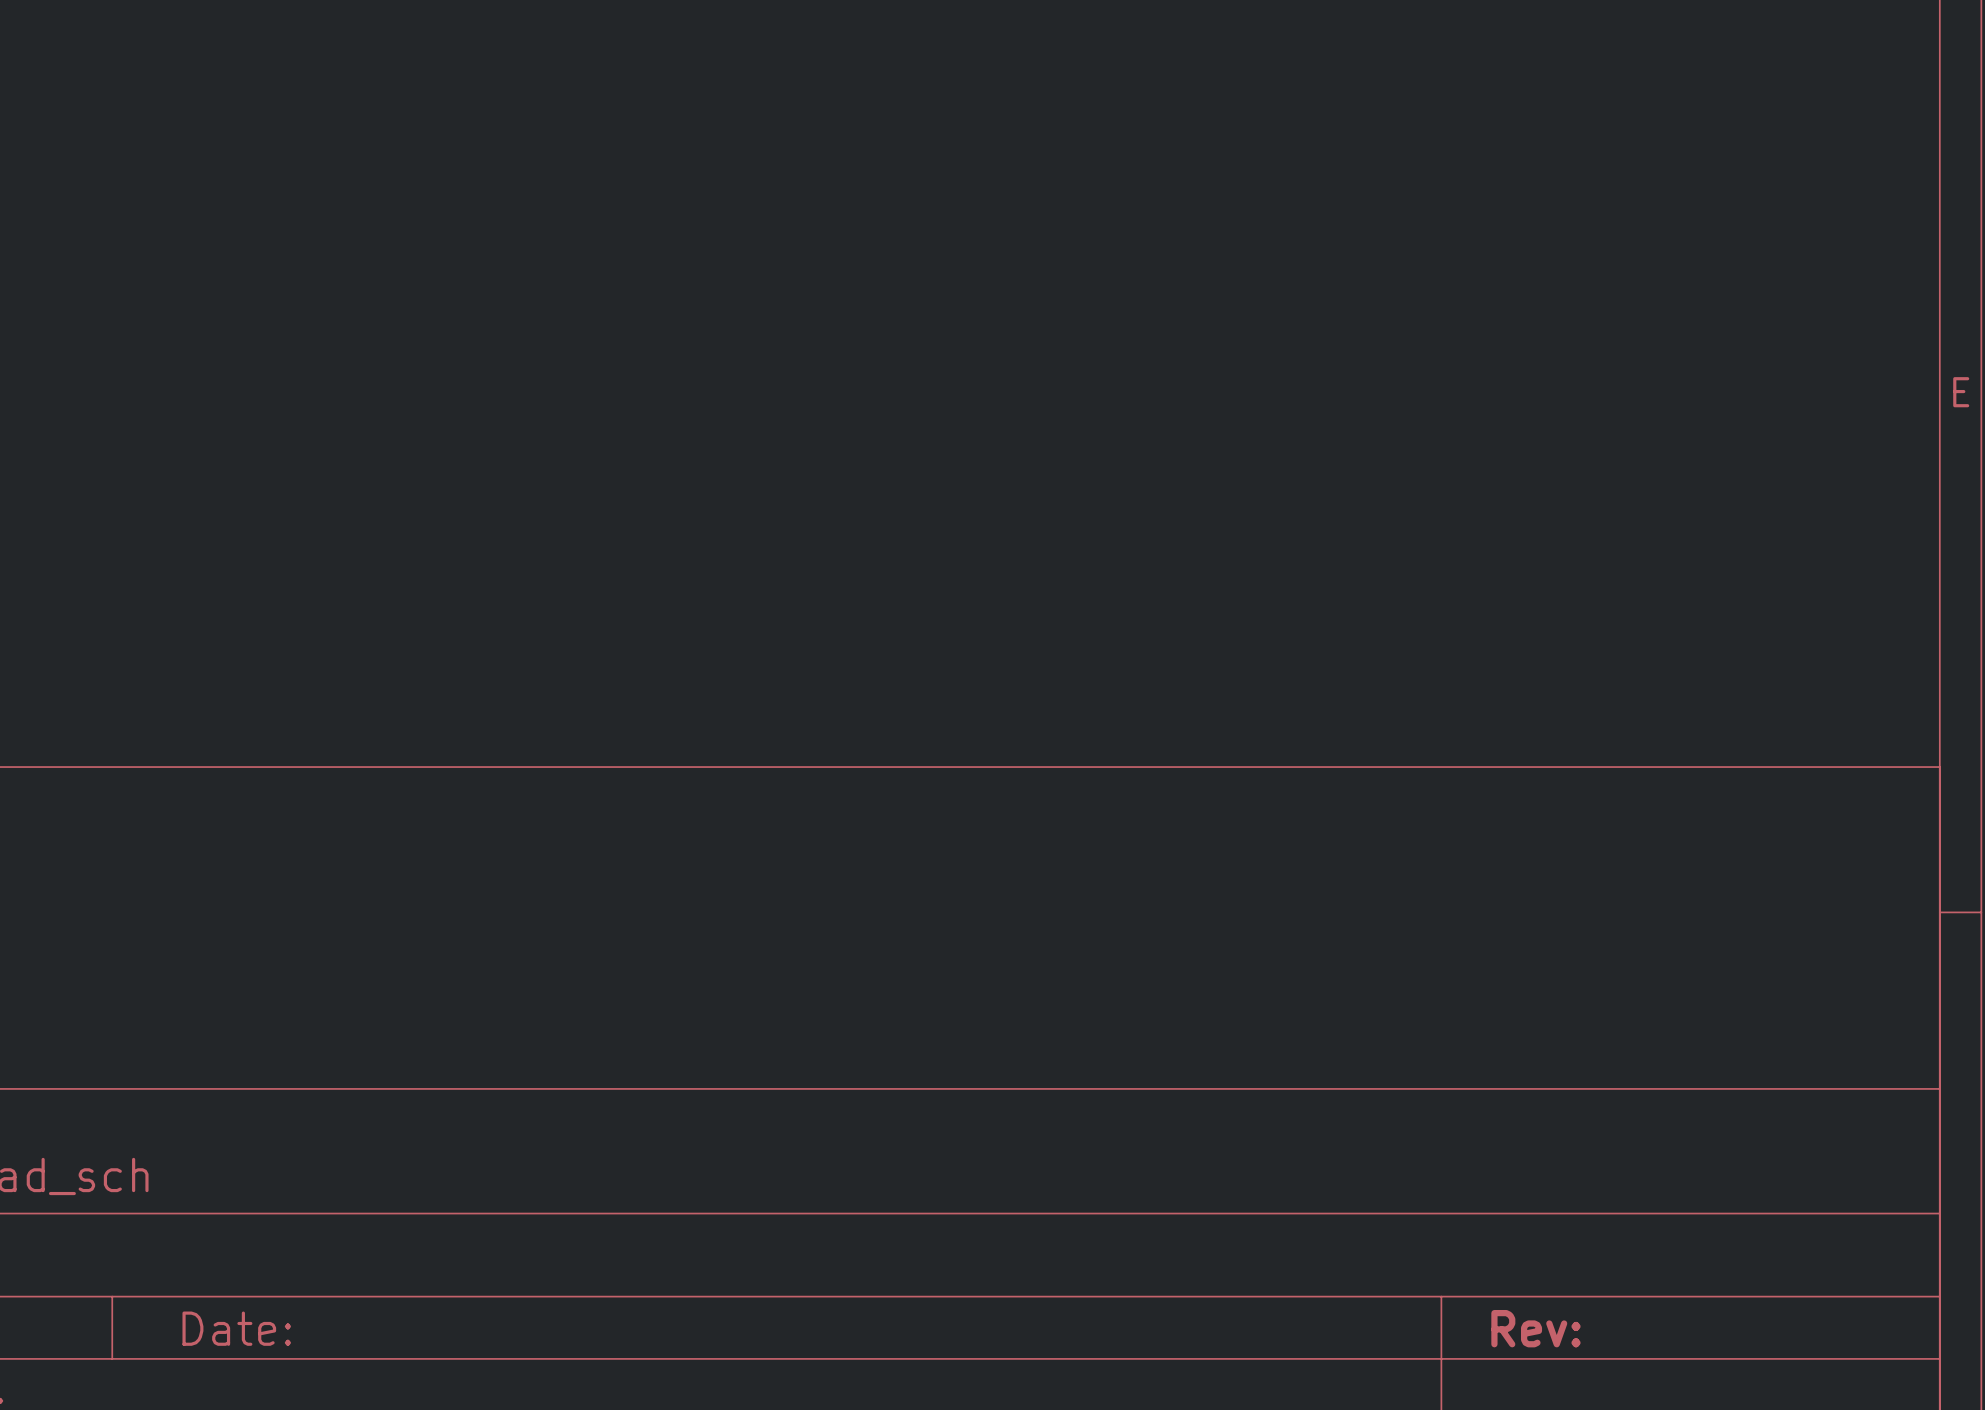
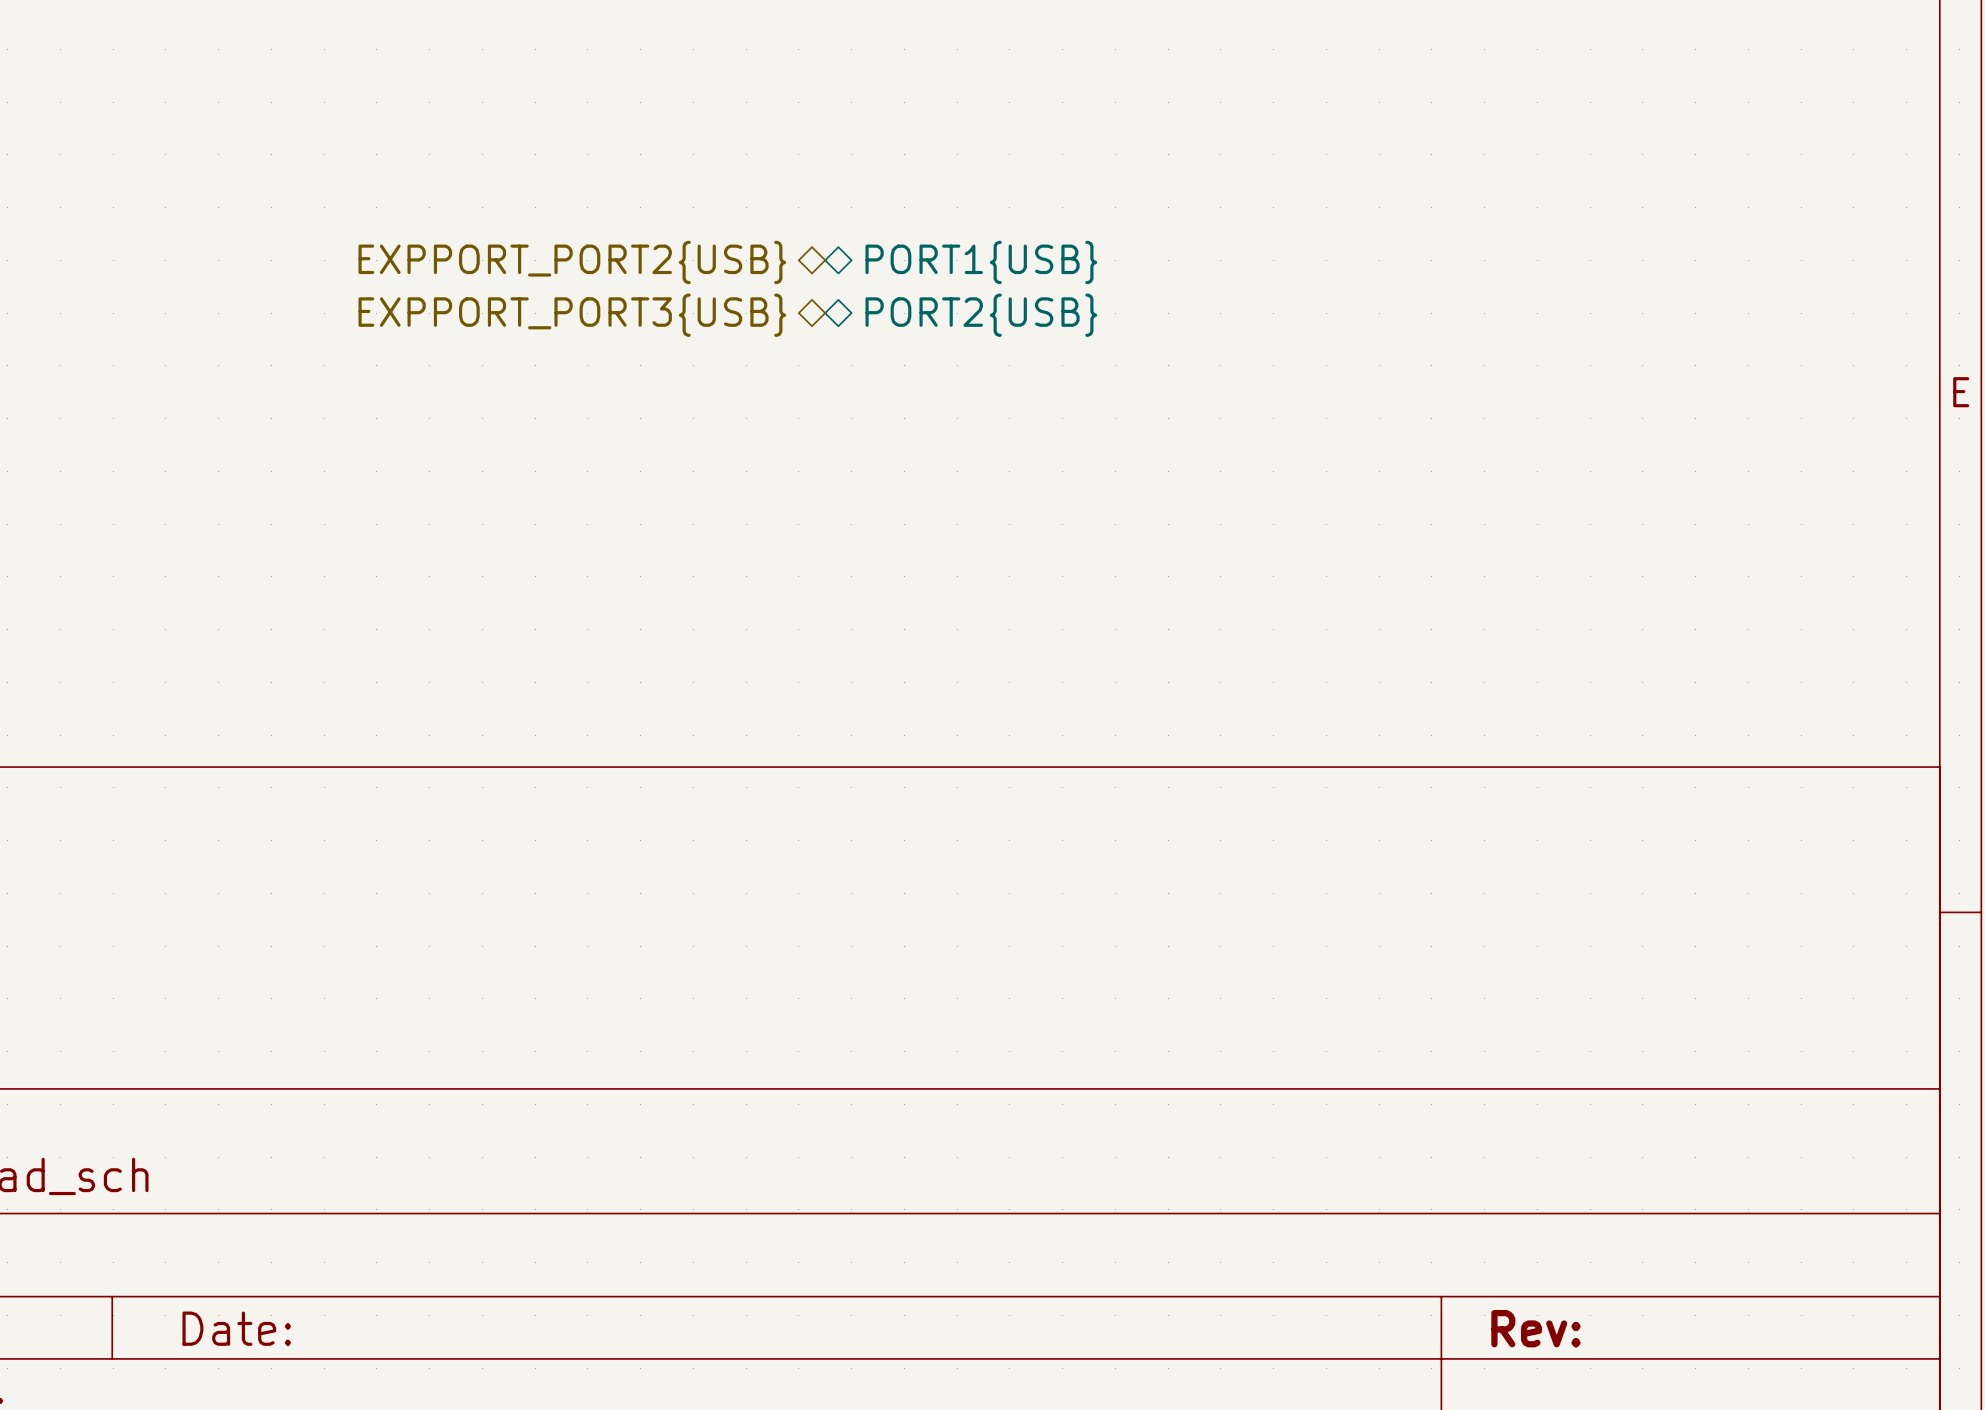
hierarchical label: none -> EXPPORT_PORT2{USB} (572, 262)
sheet pin: none -> PORT1{USB} (981, 262)
hierarchical label: none -> EXPPORT_PORT3{USB} (572, 315)
sheet pin: none -> PORT2{USB} (981, 315)

